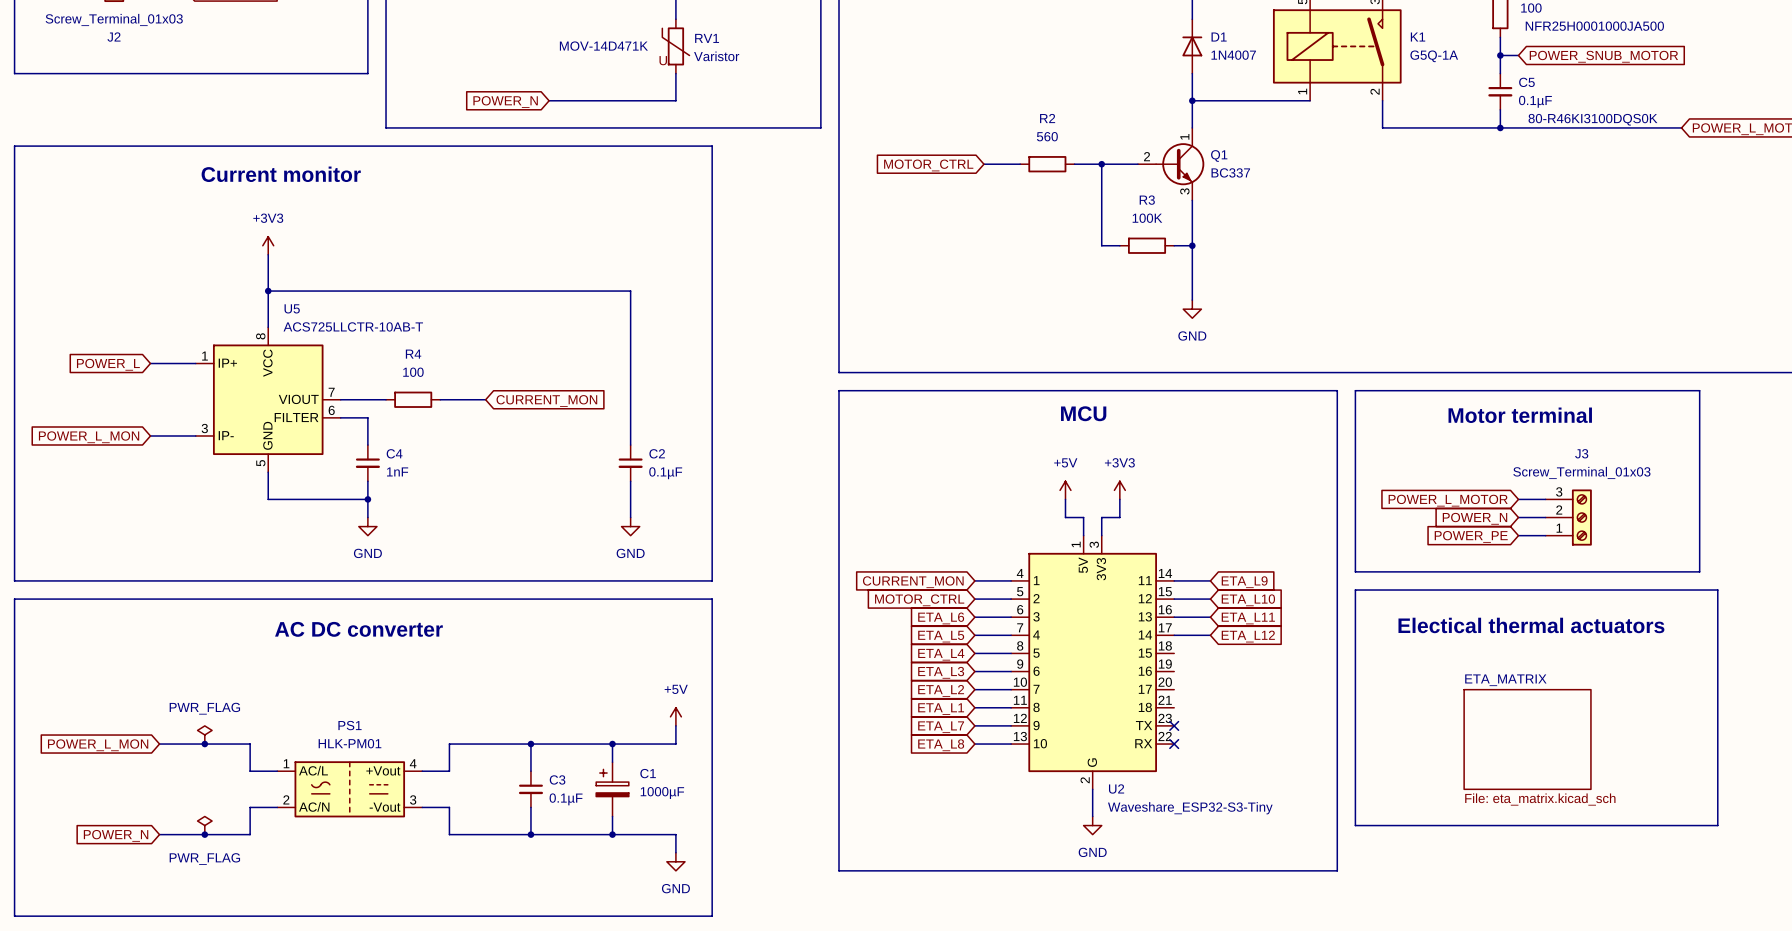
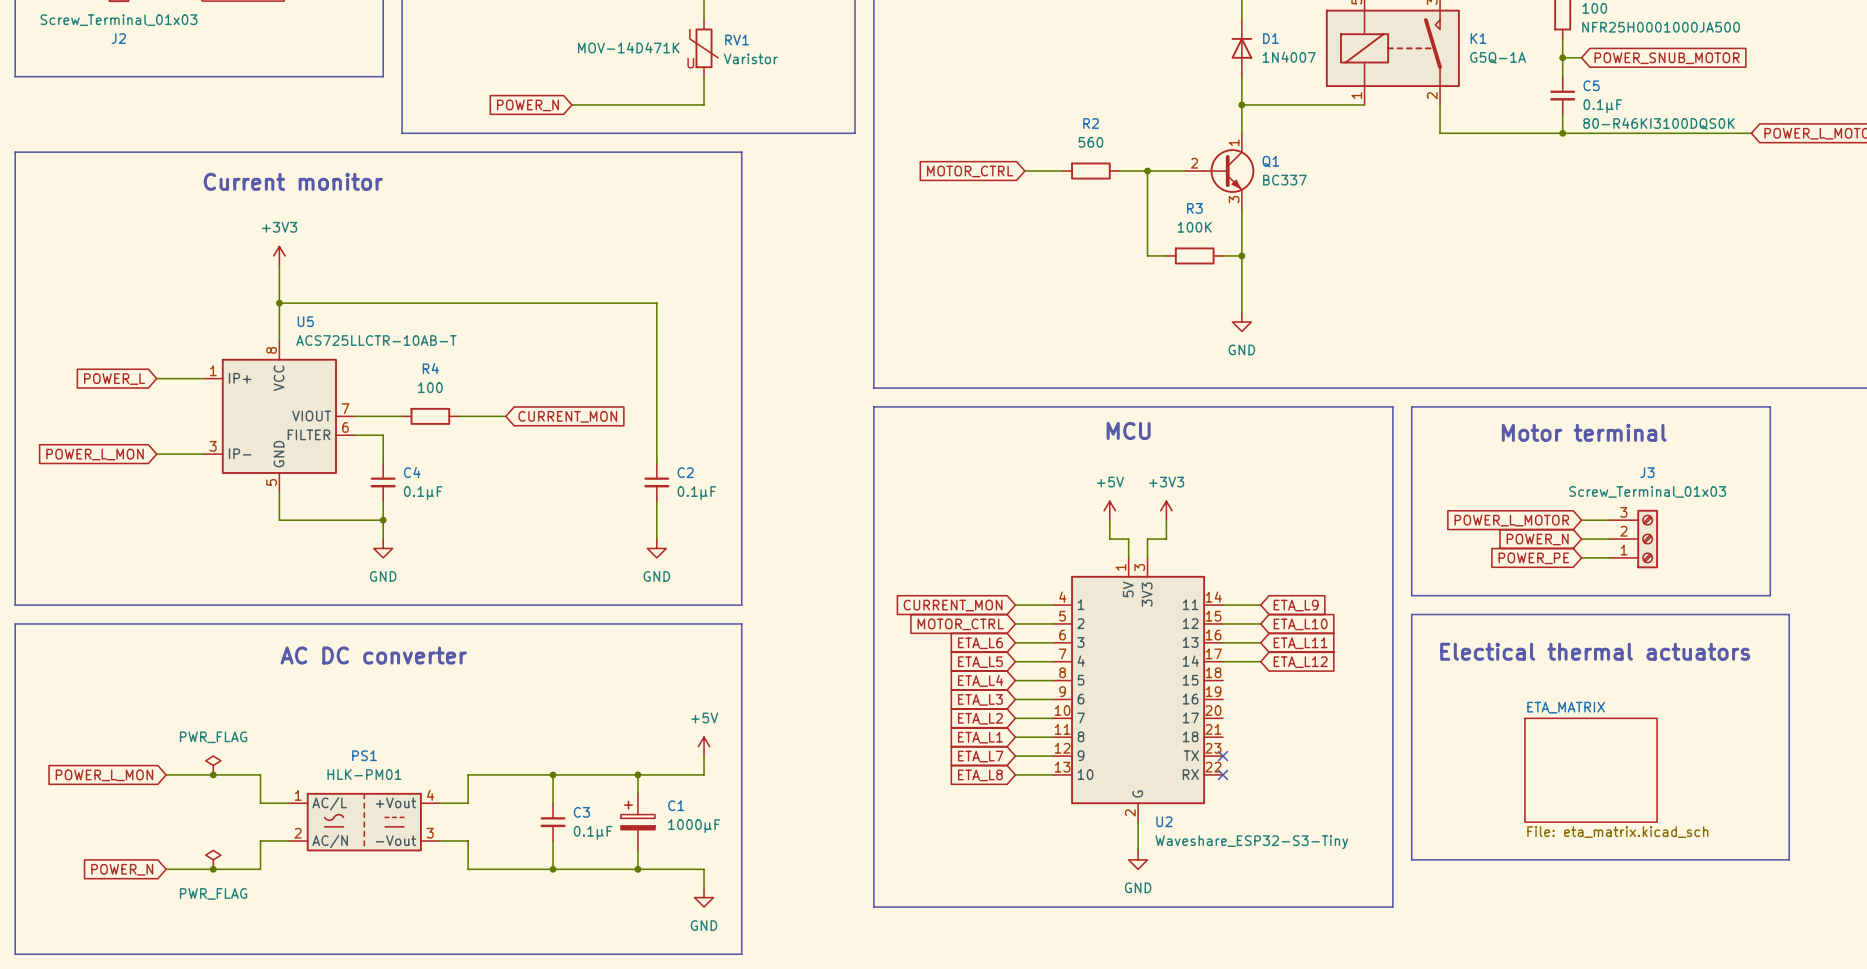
C4 value: 1nF (397, 471) -> 0.1µF (423, 493)

